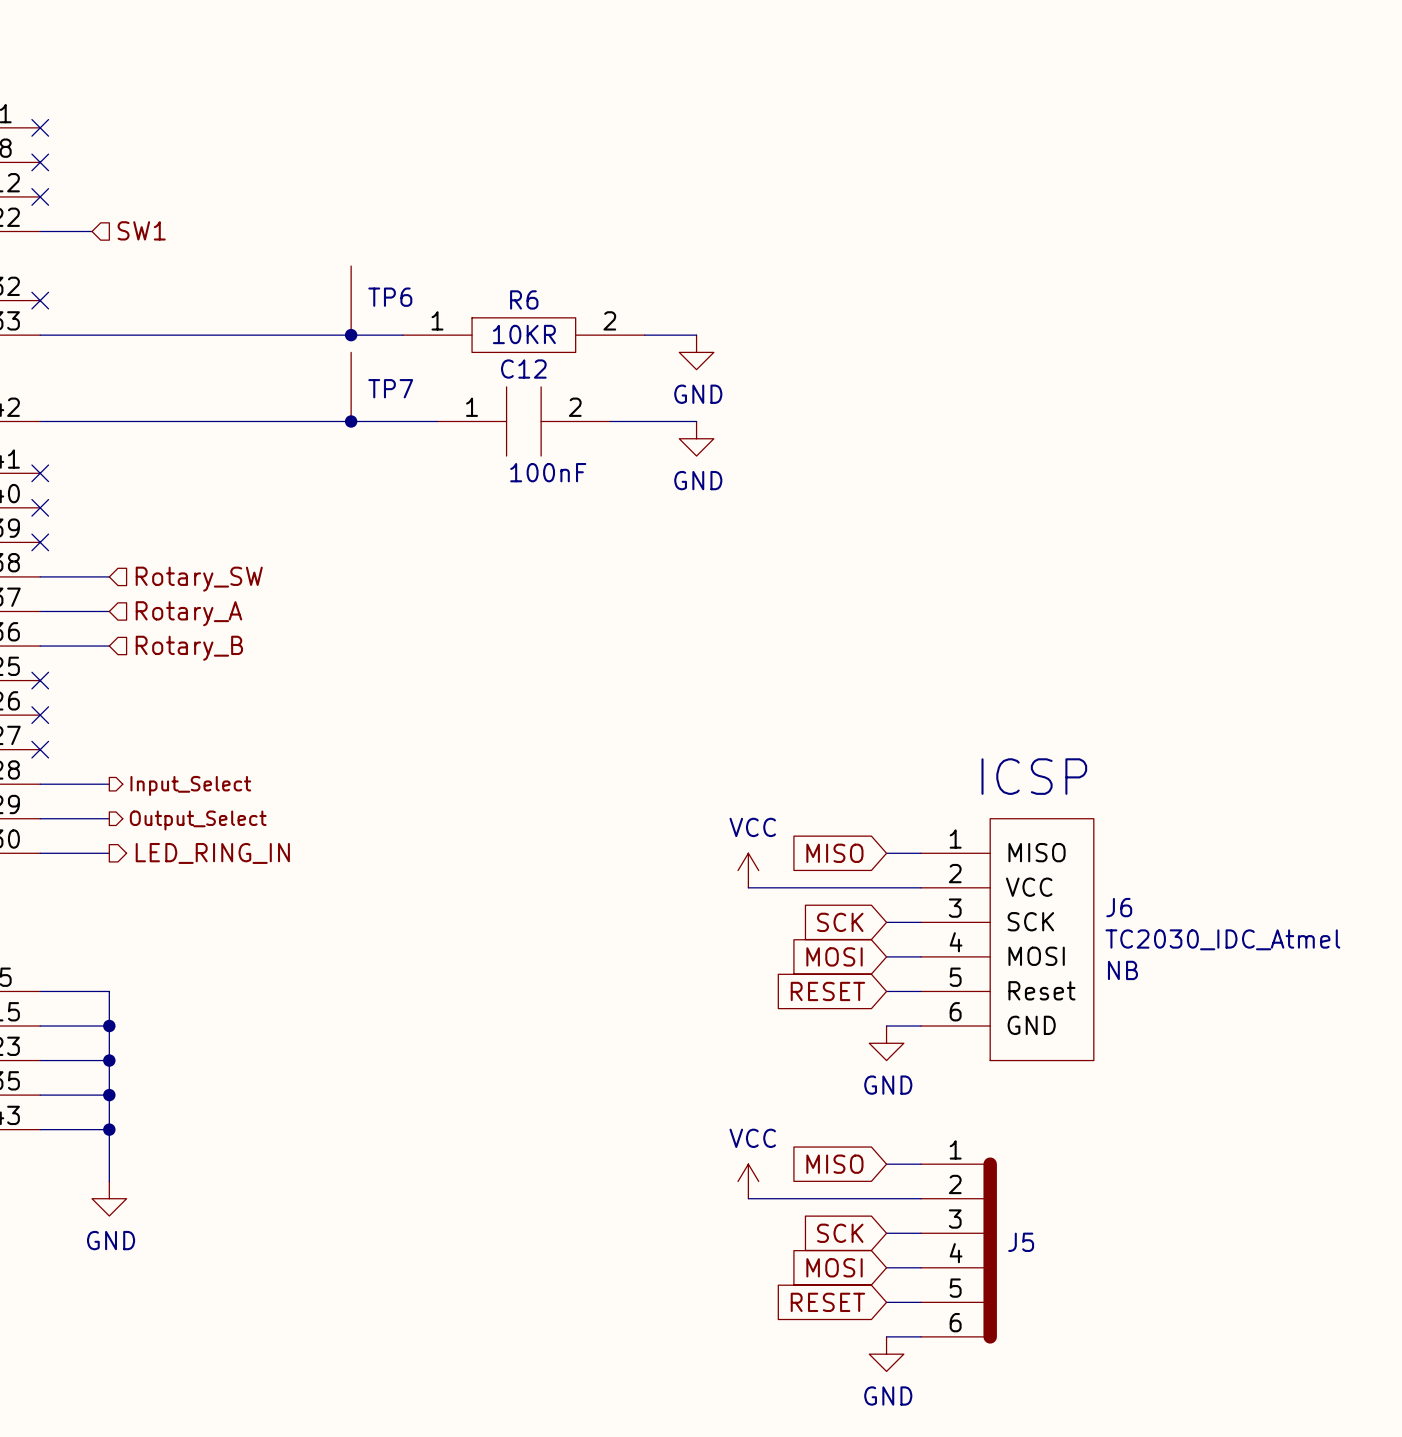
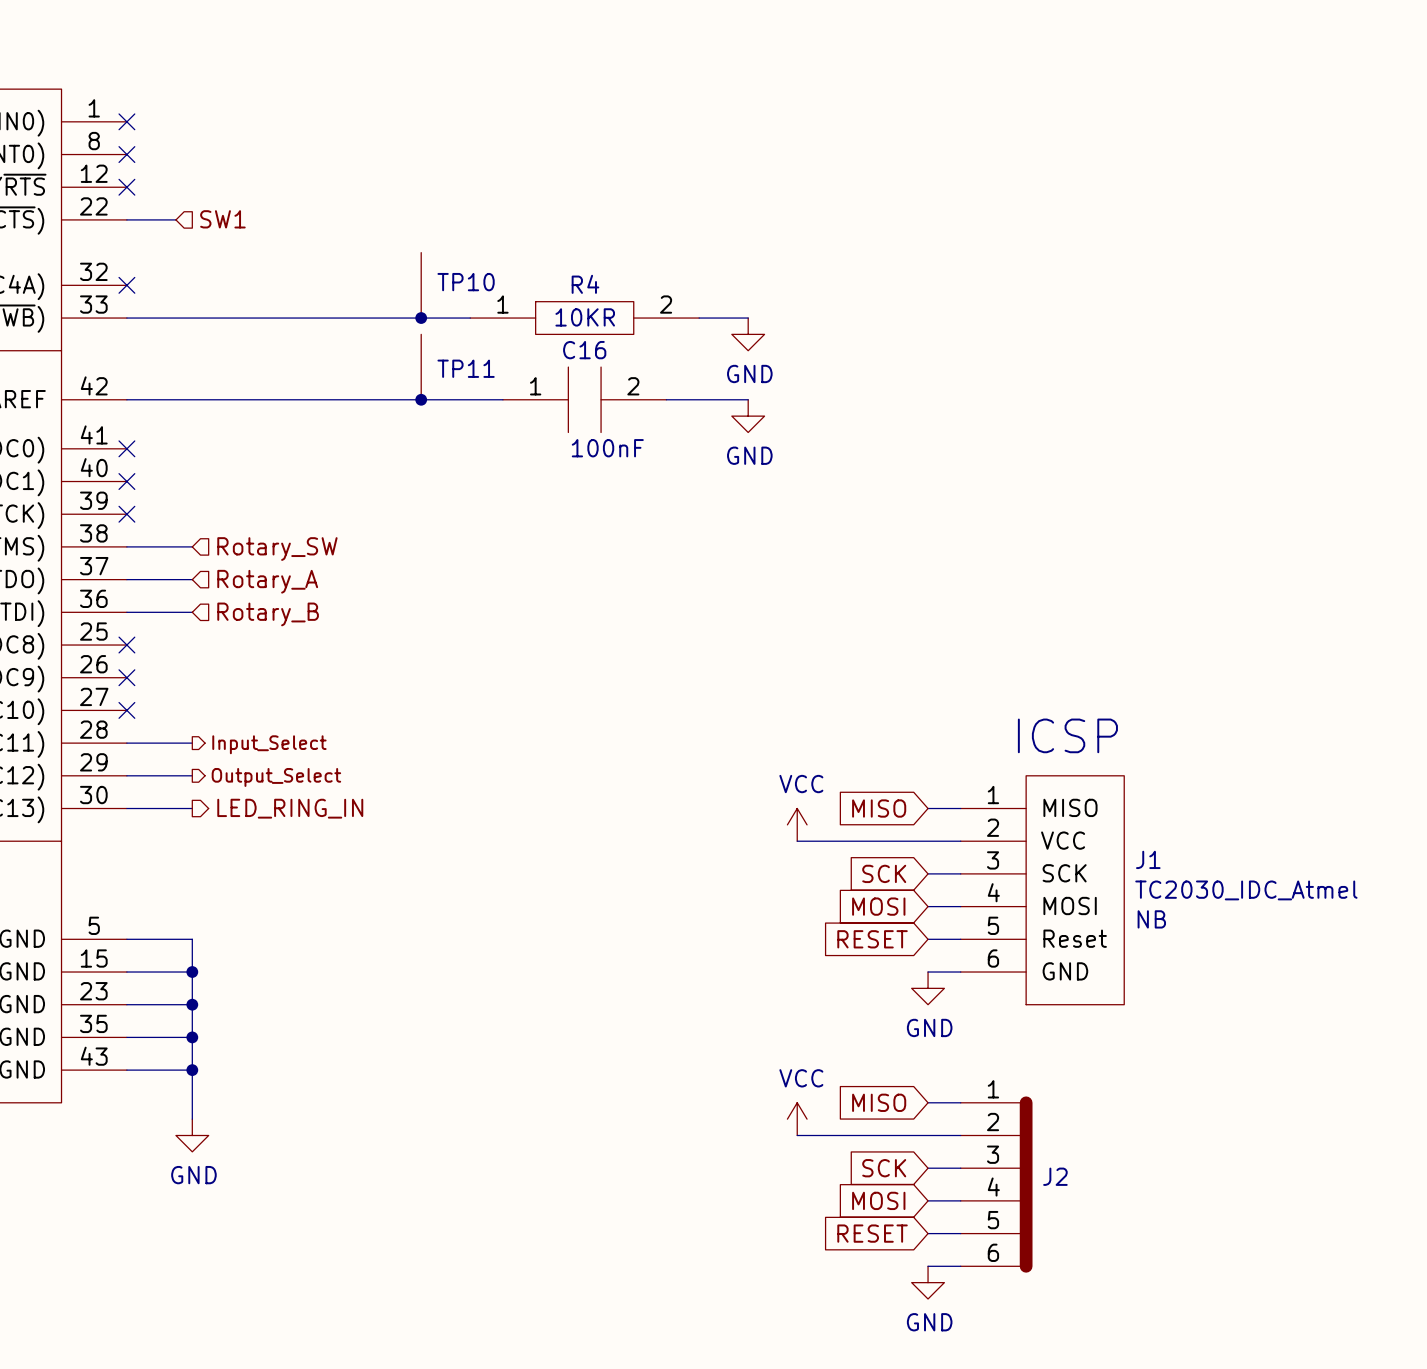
TP6 name: TP6 (390, 297) -> TP10 (466, 282)
R6 name: R6 (524, 299) -> R4 (585, 284)
C12 name: C12 (523, 369) -> C16 (584, 350)
TP7 name: TP7 (390, 388) -> TP11 (466, 368)
J6 name: J6 (1119, 907) -> J1 (1148, 859)
J5 name: J5 (1021, 1242) -> J2 (1055, 1176)

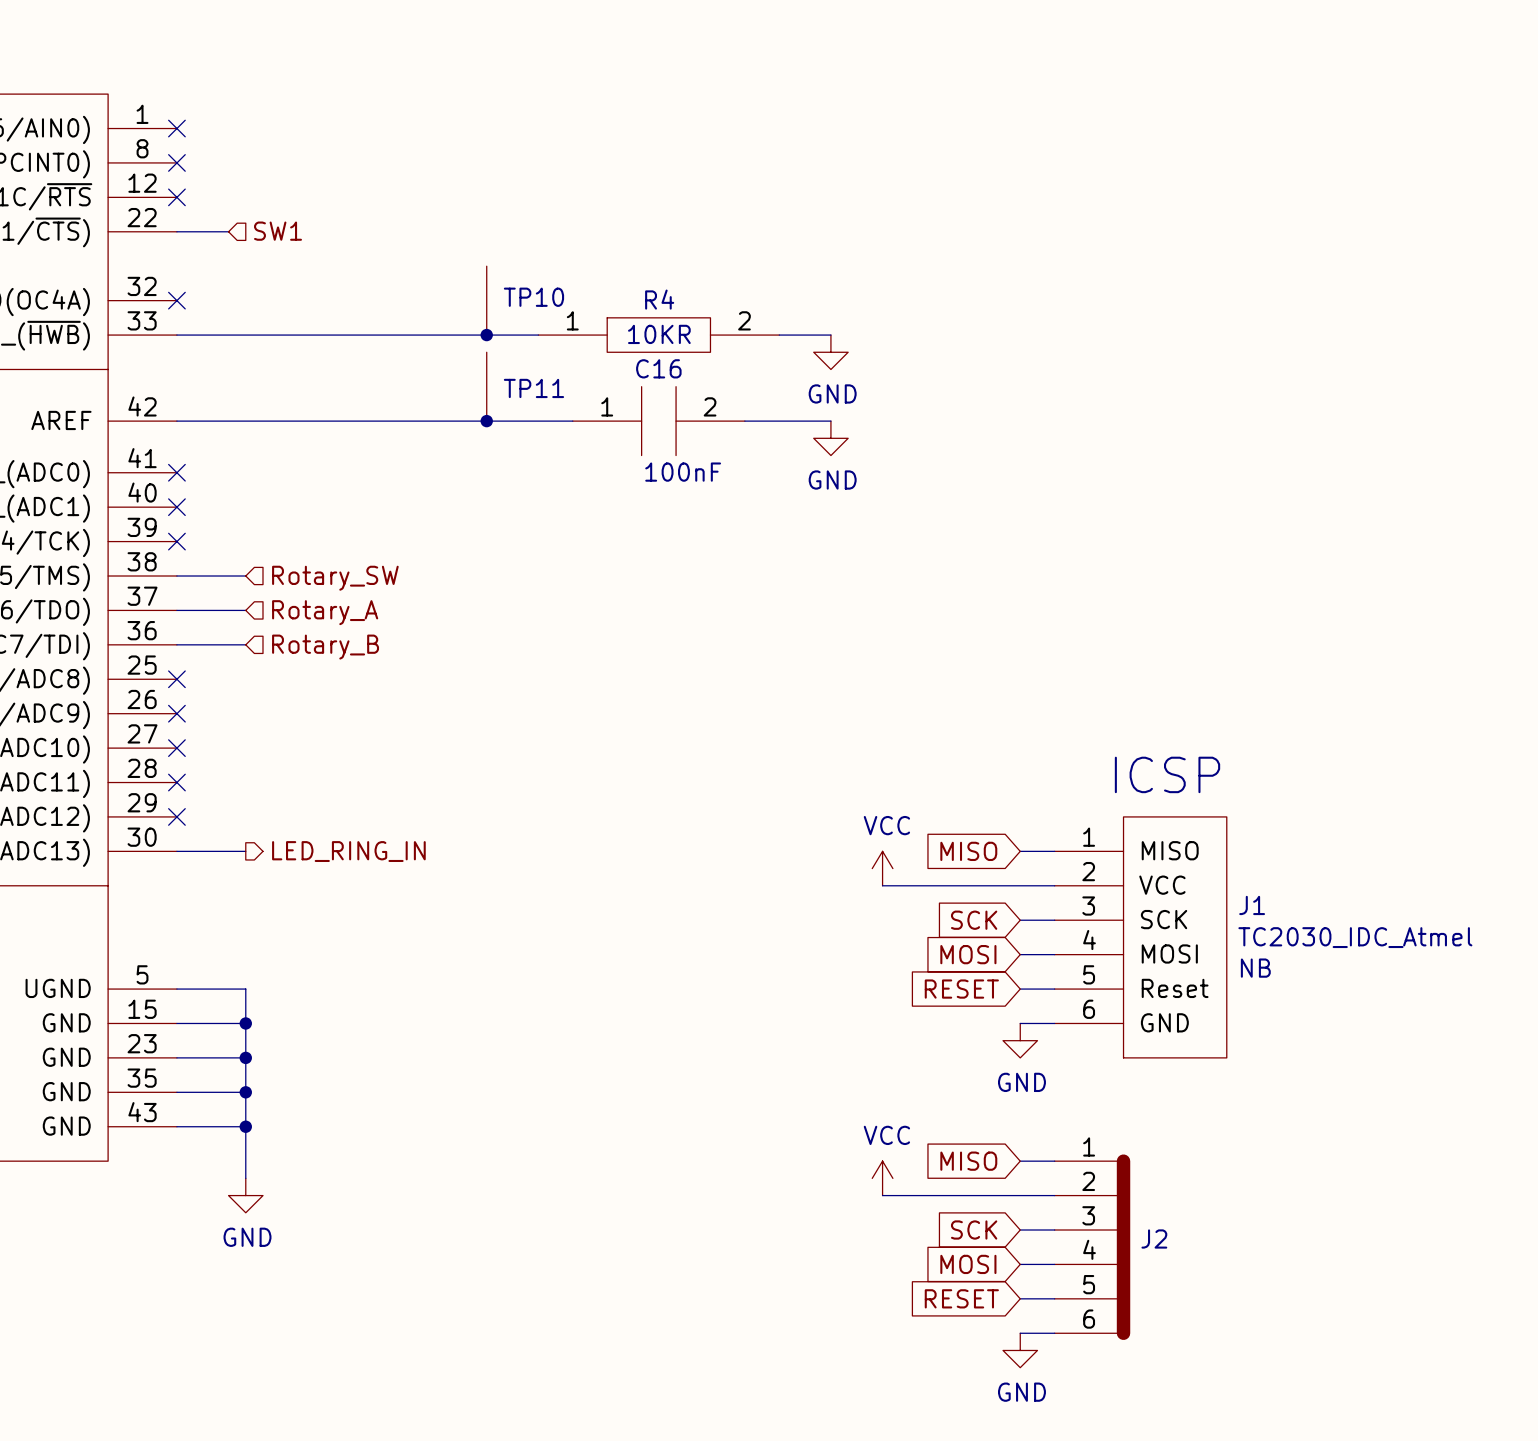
wire: (126, 743) (192, 743) -> none
no-connect mark: none -> (176, 782)
hierarchical label: Input_Select (269, 744) -> none
wire: (126, 775) (192, 775) -> none
no-connect mark: none -> (176, 816)
hierarchical label: Output_Select (276, 777) -> none

